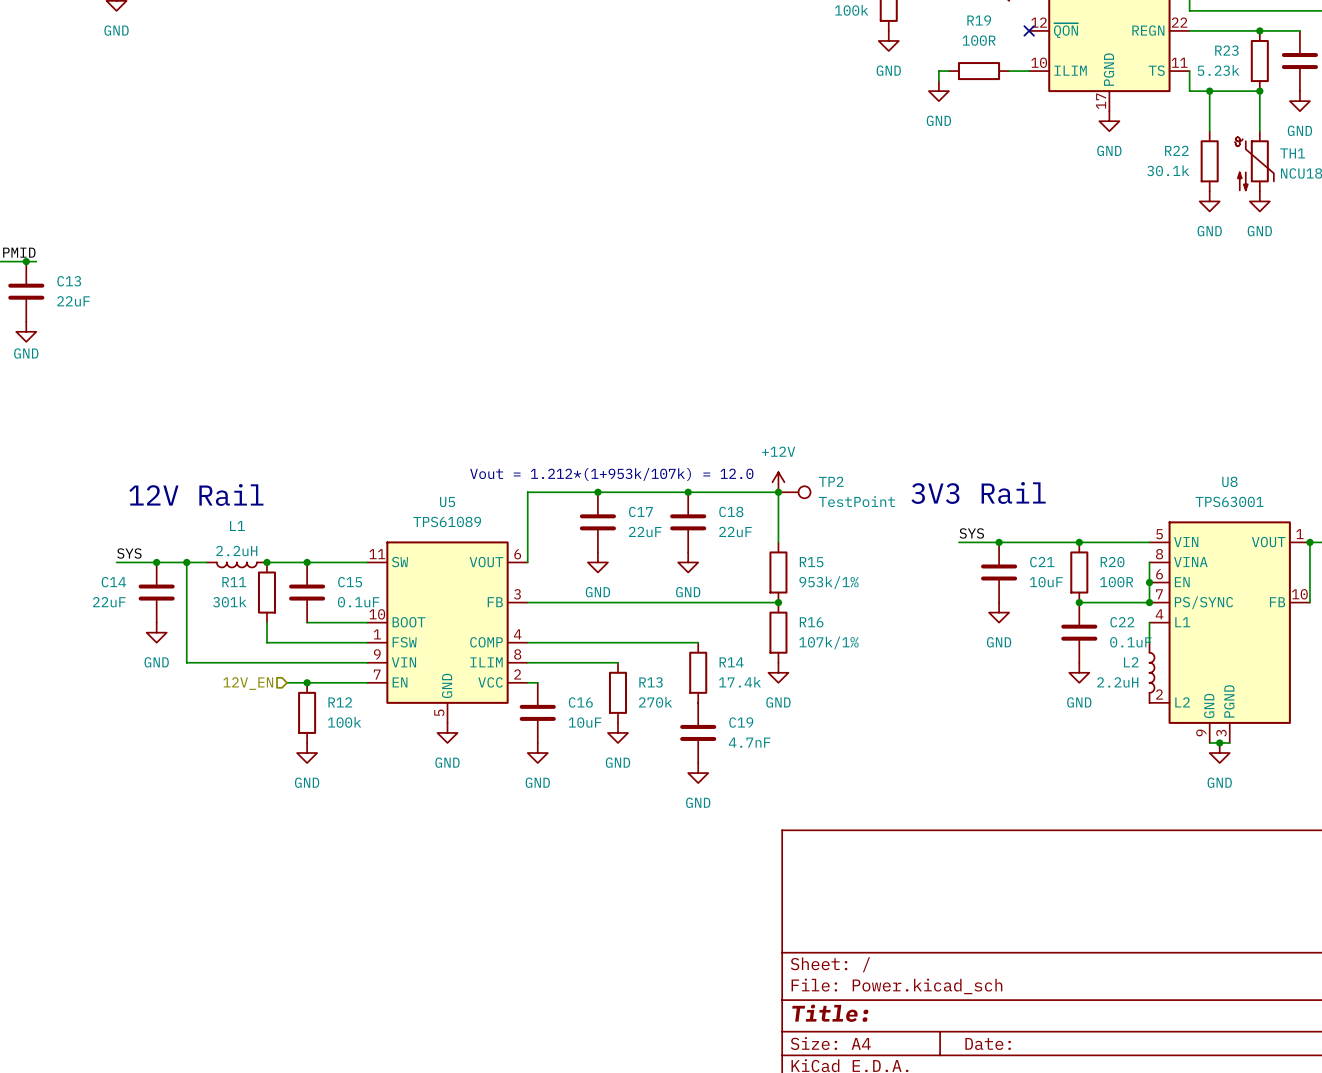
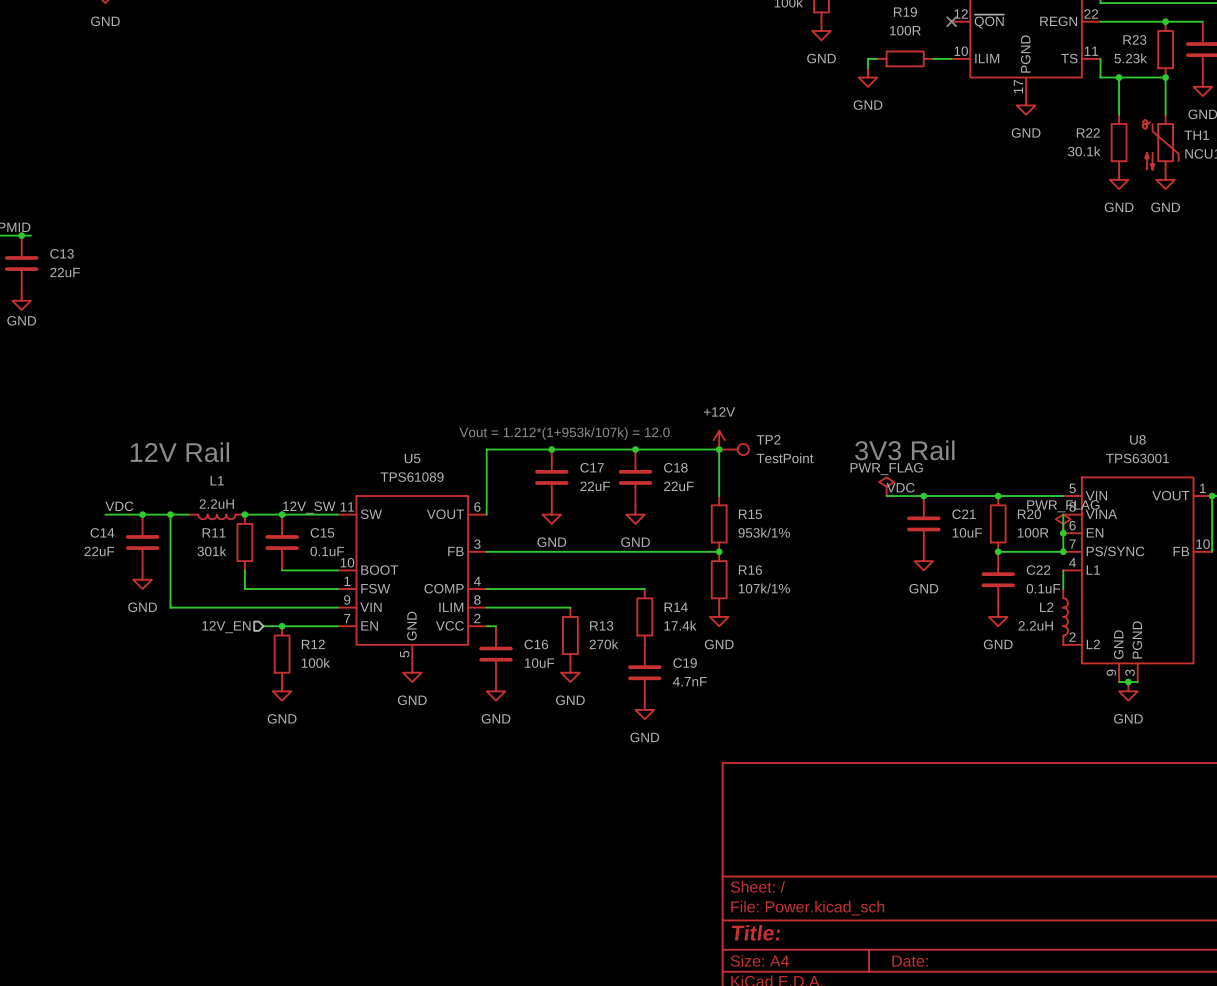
power symbol: none -> PWR_FLAG (886, 486)
label: SYS (971, 533) -> VDC (900, 487)
label: SYS (129, 553) -> VDC (119, 506)
label: none -> 12V_SW (309, 507)
power symbol: none -> PWR_FLAG (1063, 523)

